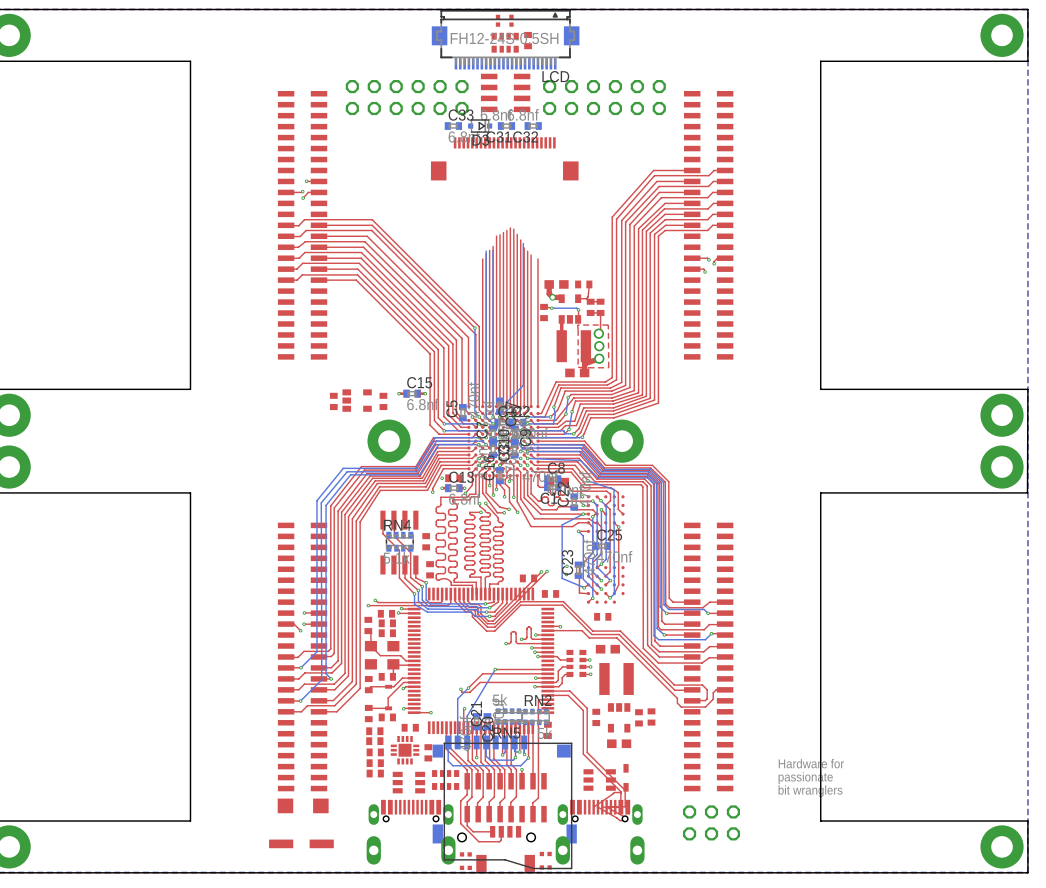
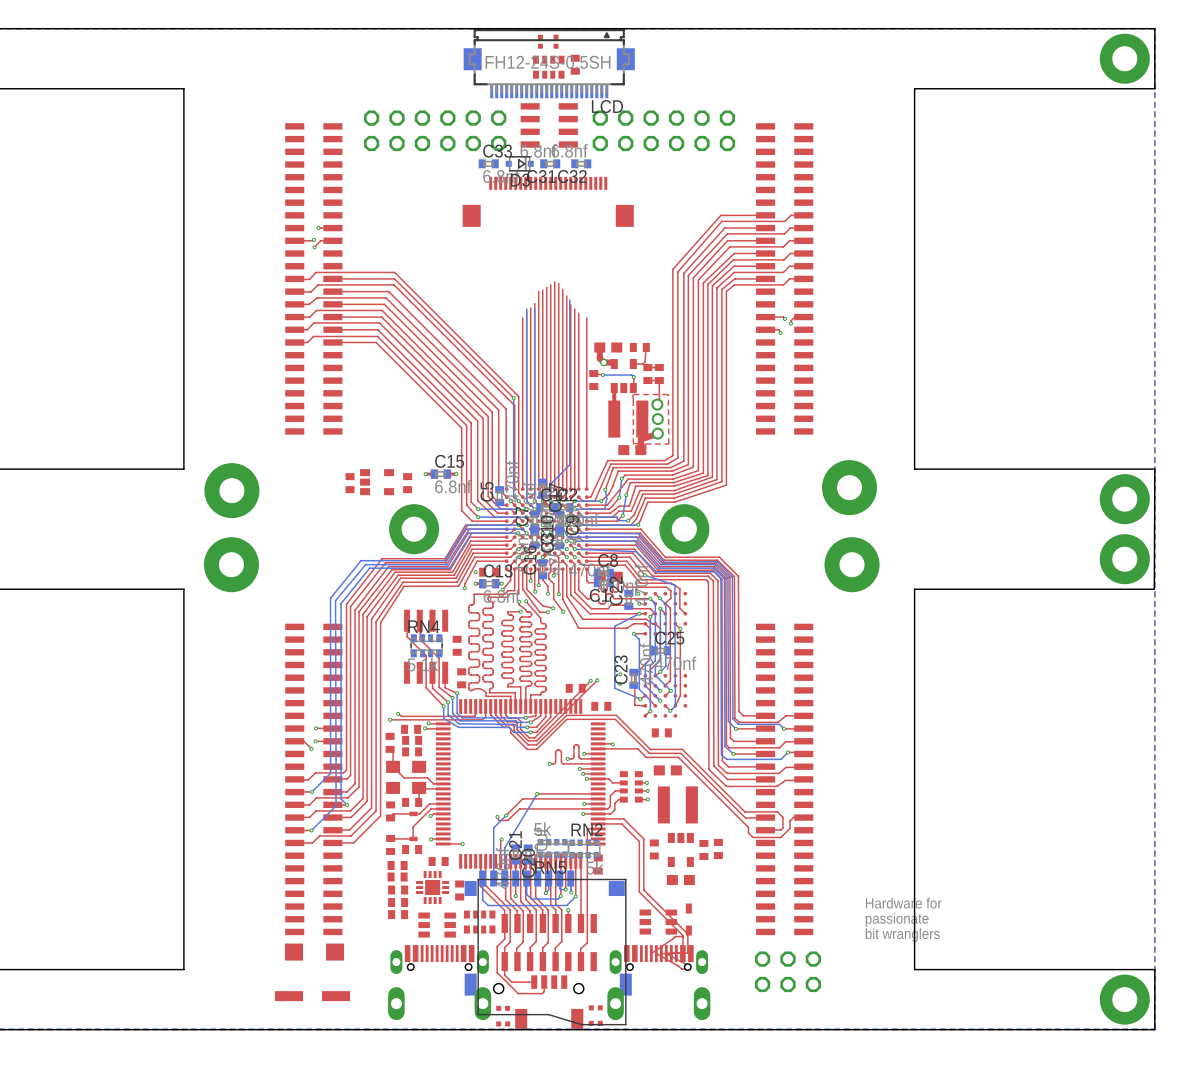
part: none -> (849, 487)
part: none -> (231, 490)
part: none -> (231, 564)
part: none -> (852, 564)

